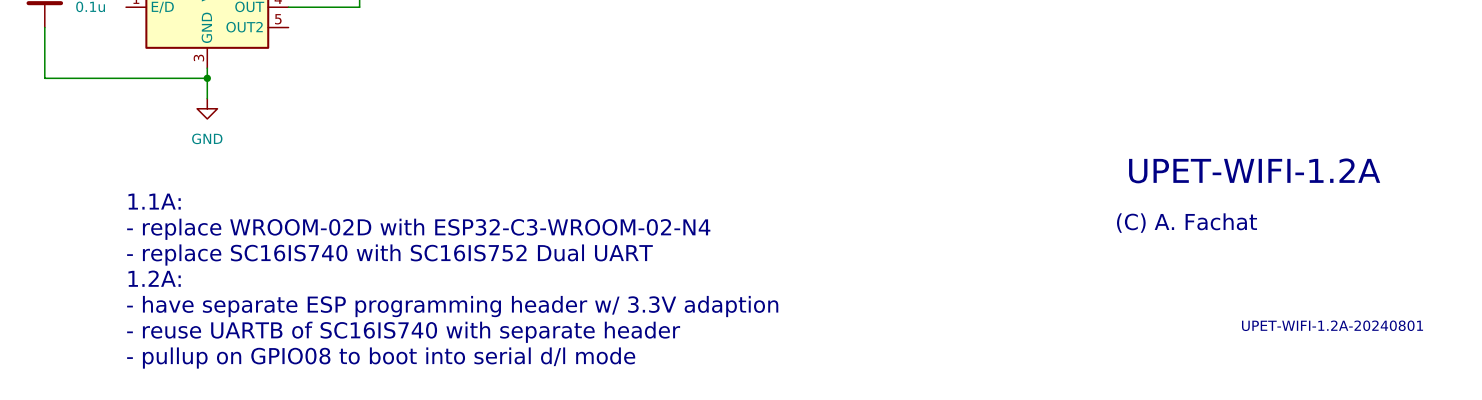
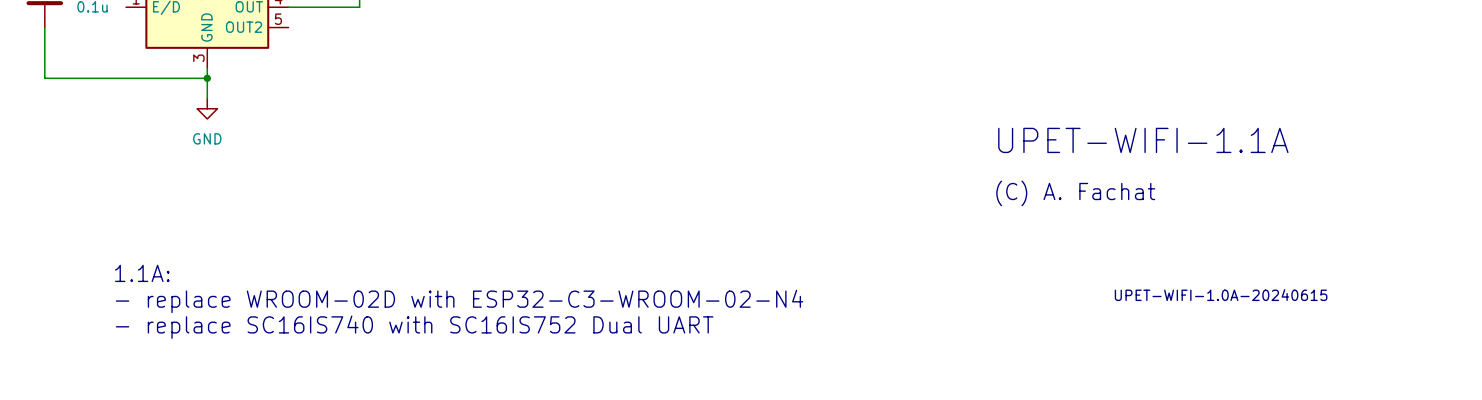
text: UPET-WIFI-1.2A (1254, 170) -> UPET-WIFI-1.1A (1143, 140)
text position: 1.1A: (154, 201) -> 1.1A: (142, 273)
text position: (C) A. Fachat (1187, 223) -> (C) A. Fachat (1075, 193)
text position: - replace WROOM-02D with ESP32-C3-WROOM-02-N4 (418, 229) -> - replace WROOM-02D with ESP32-C3-WROOM-02-N4 (459, 301)
text position: - replace SC16IS740 with SC16IS752 Dual UART (389, 255) -> - replace SC16IS740 with SC16IS752 Dual UART (414, 327)
text: 1.2A: (154, 278) -> none
text: none -> UPET-WIFI-1.0A-20240615 (1221, 295)
text: - have separate ESP programming header w/ 3.3V adaption (452, 306) -> none
text: UPET-WIFI-1.2A-20240801 (1332, 325) -> none
text: - reuse UARTB of SC16IS740 with separate header (403, 332) -> none
text: - pullup on GPIO08 to boot into serial d/l mode (381, 358) -> none

